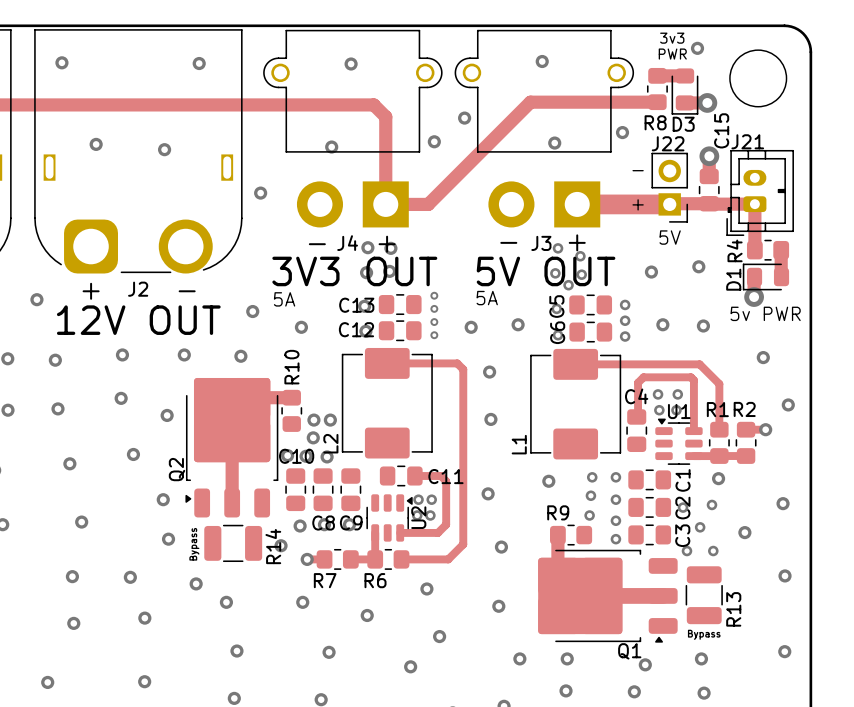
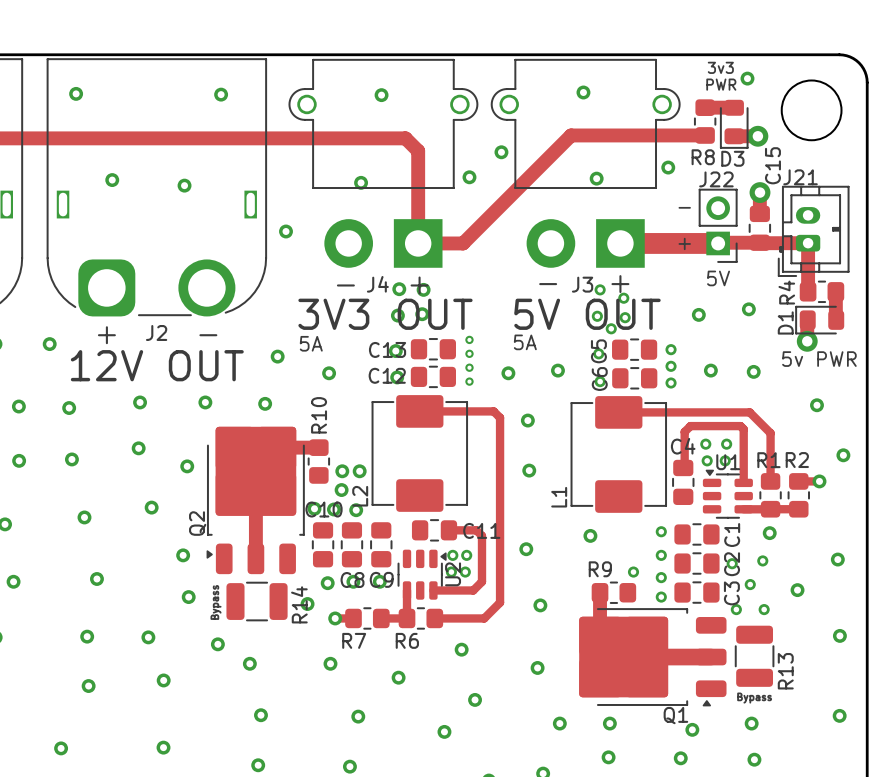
via: (592, 477) -> none
via: (590, 495) -> none

